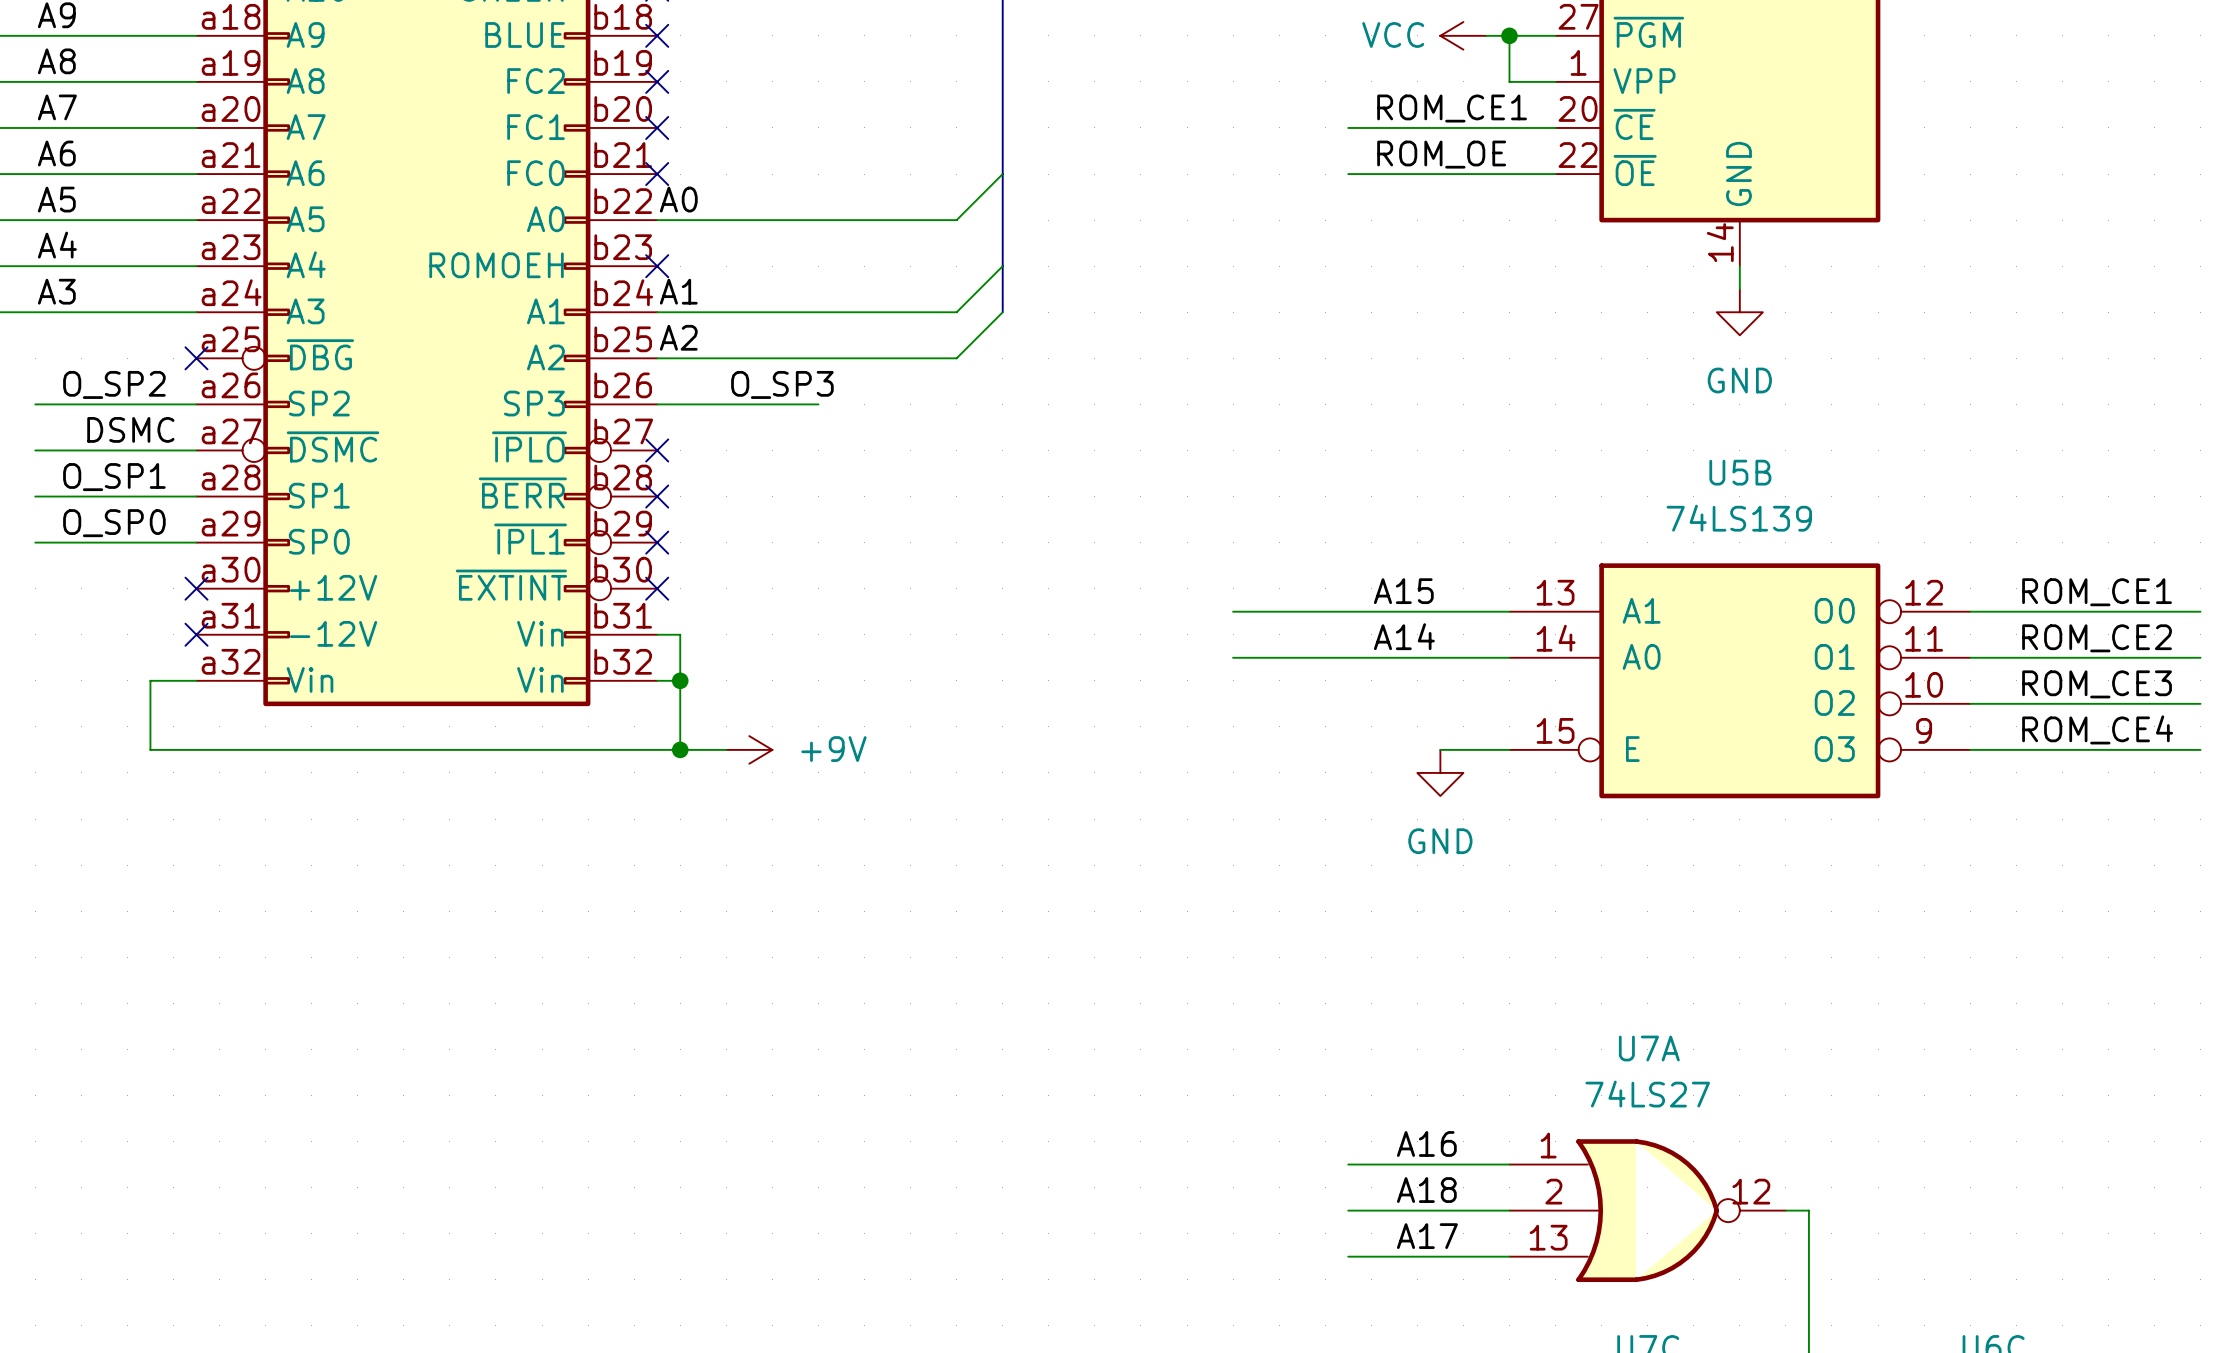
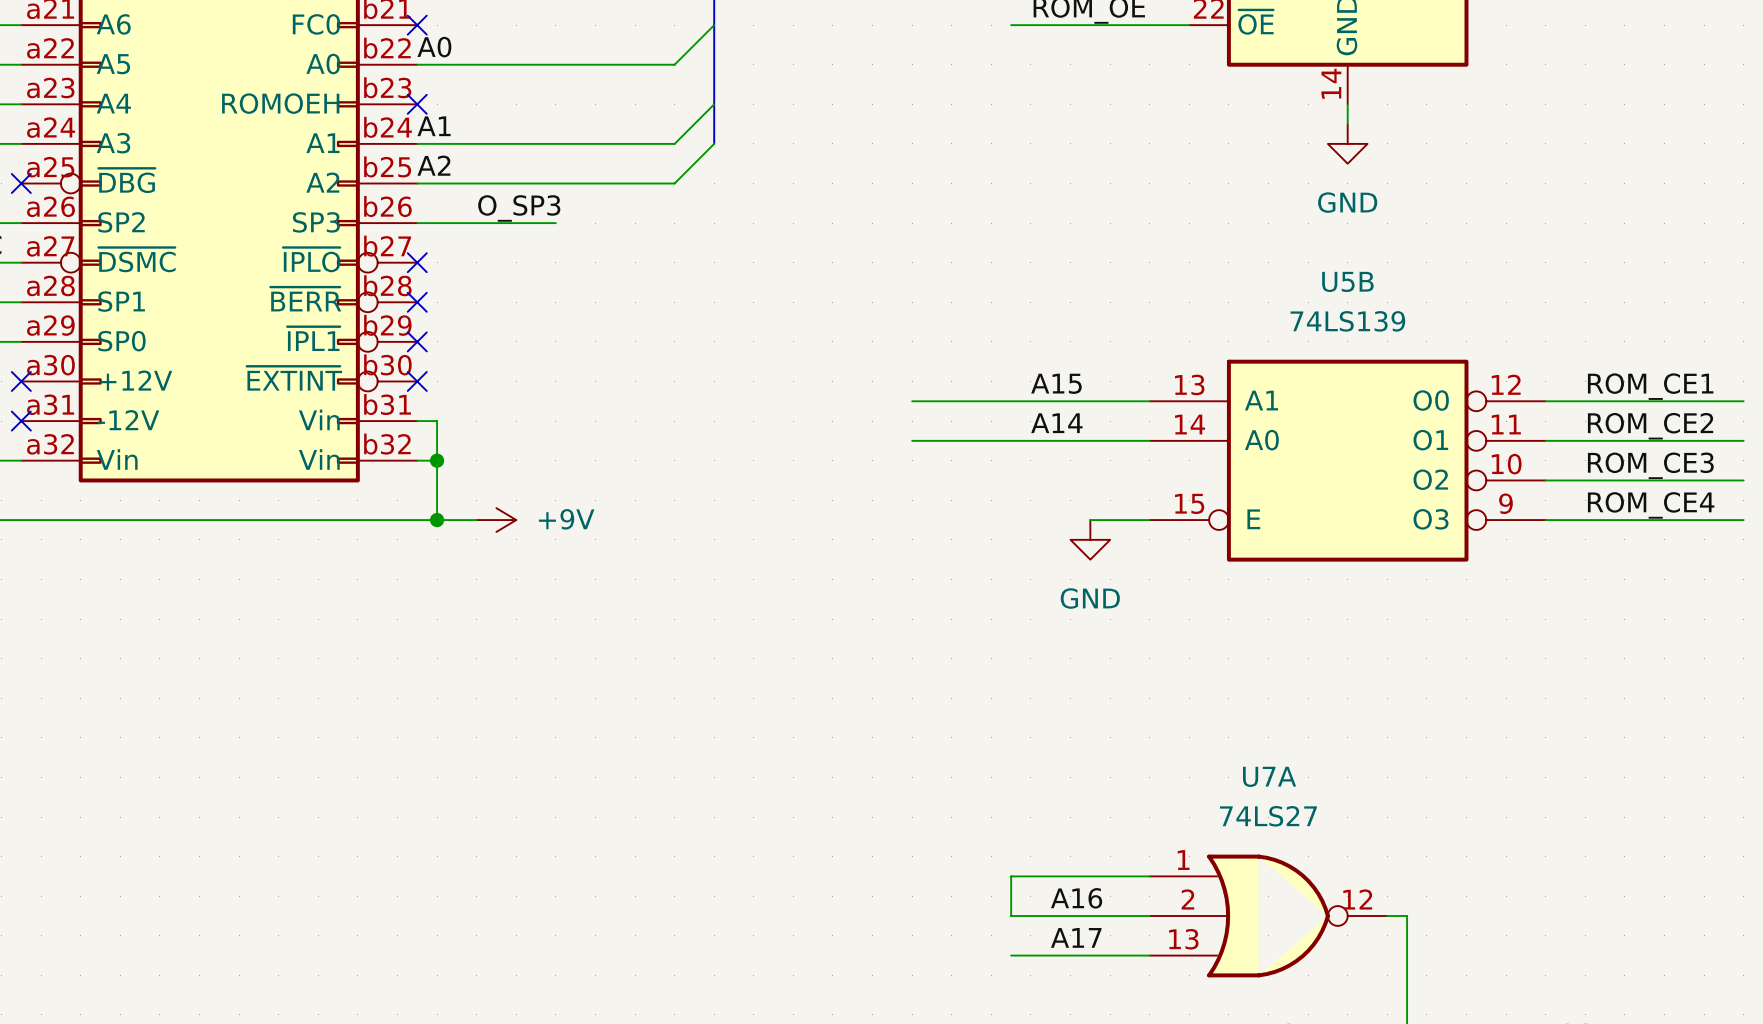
label: A16 (1426, 1143) -> none
wire: none -> (1011, 876) (1011, 915)
label: A18 (1426, 1190) -> A16 (1076, 898)

